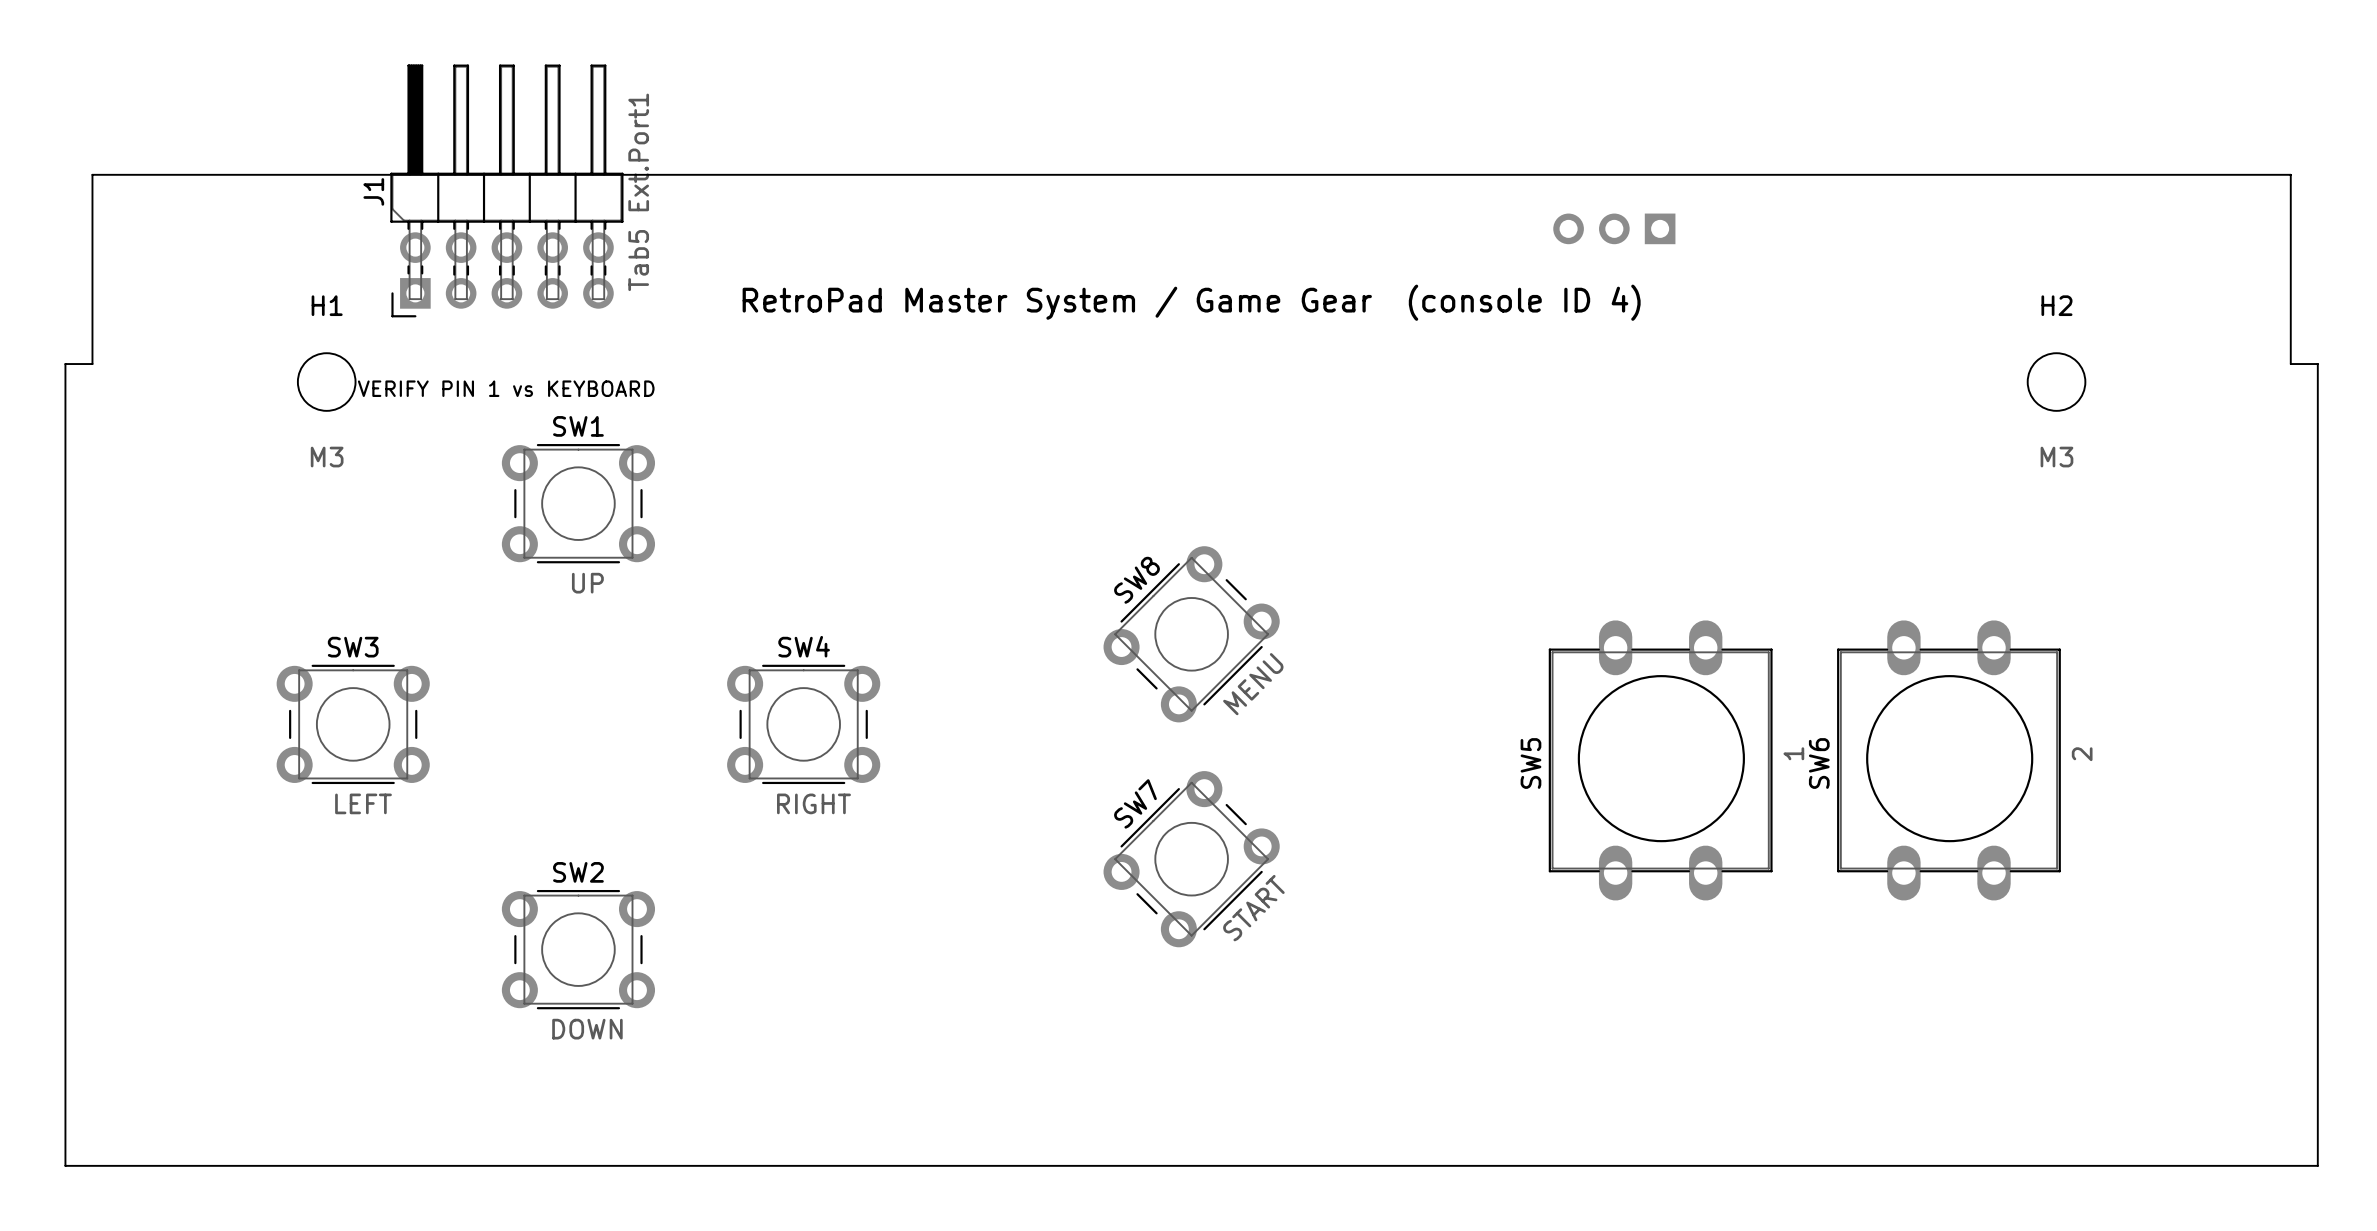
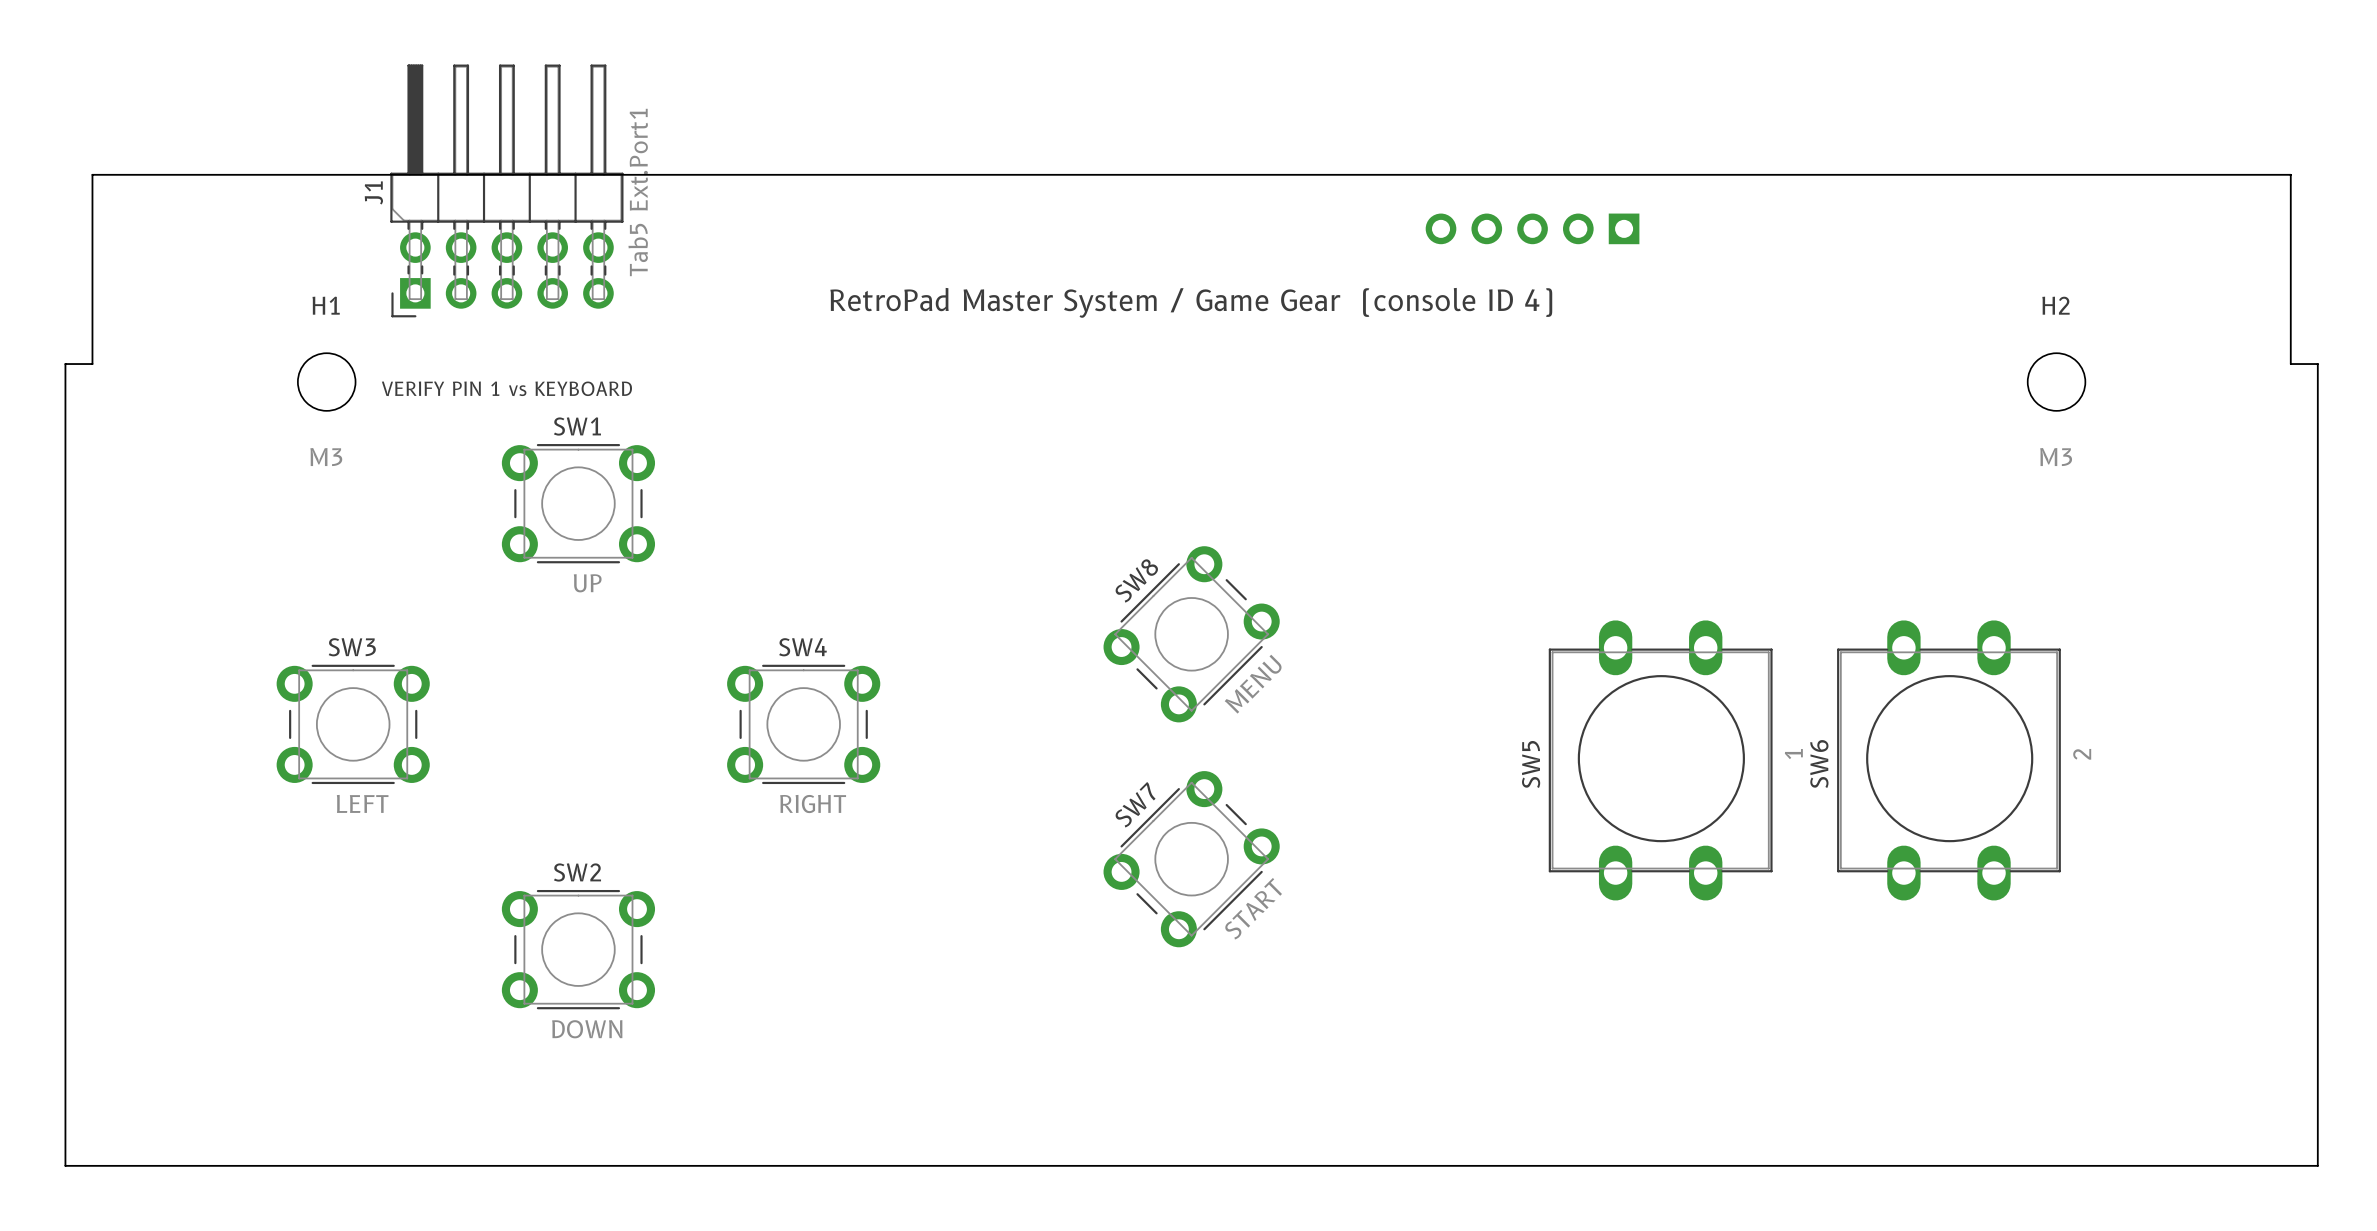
part: none -> (1532, 228)
part: (1614, 228) -> none

